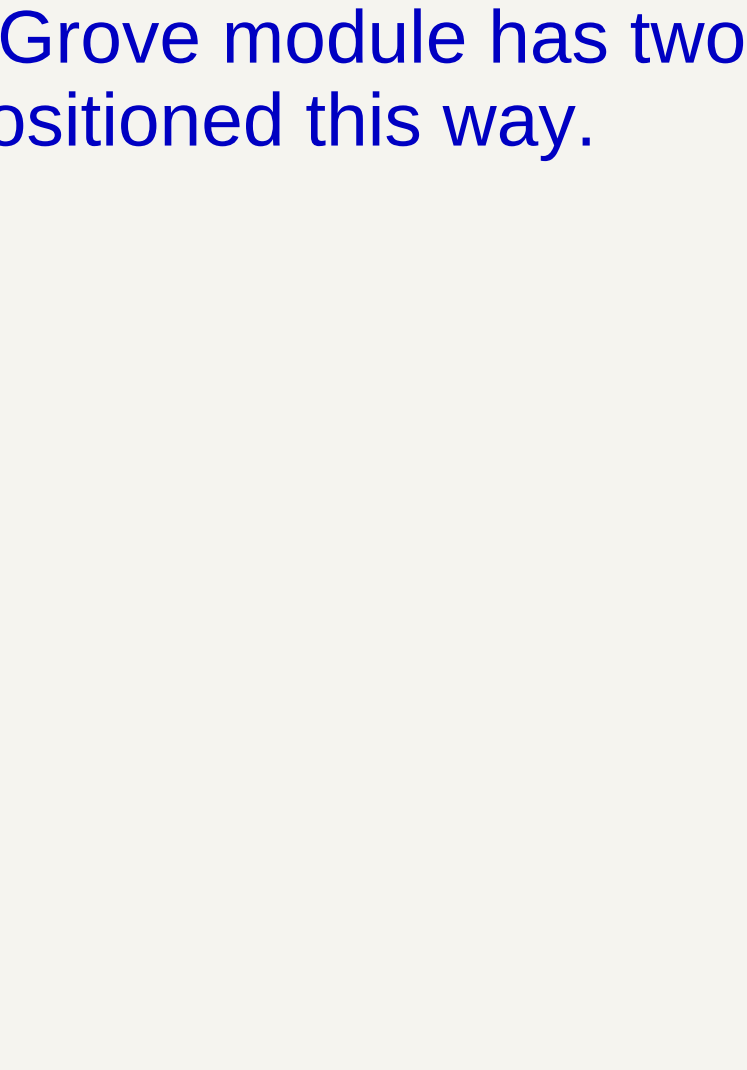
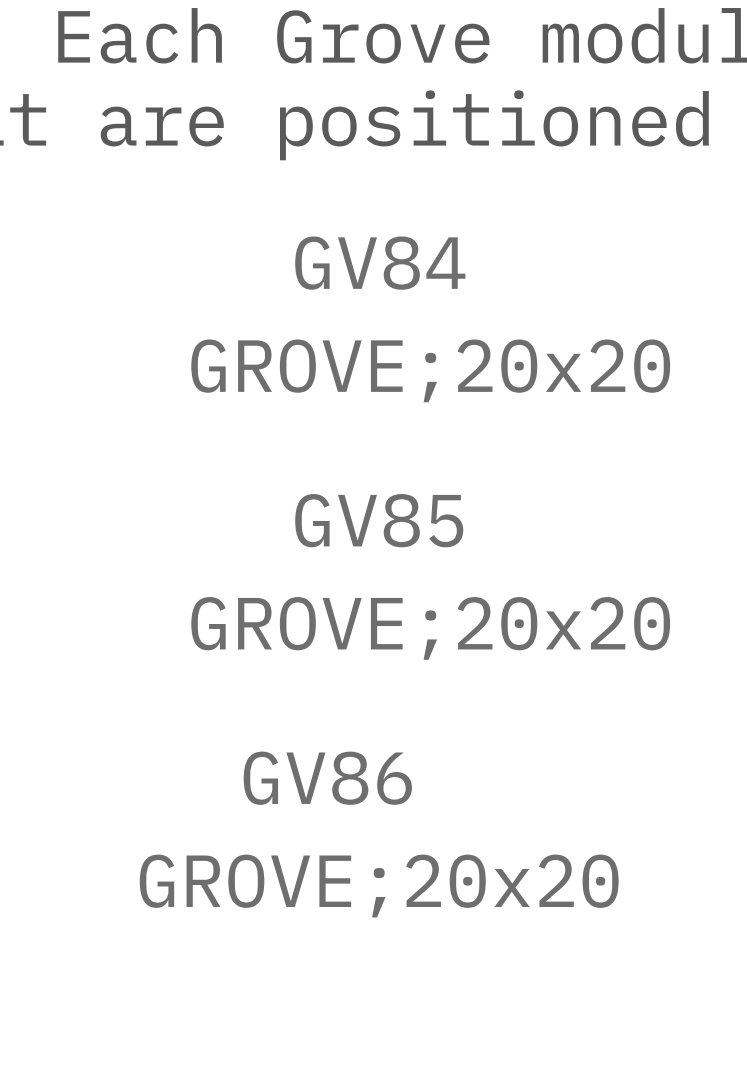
GV84: none -> GROVE;20x20 (430, 319)
GV85: none -> GROVE;20x20 (430, 576)
GV86: none -> GROVE;20x20 (379, 834)

